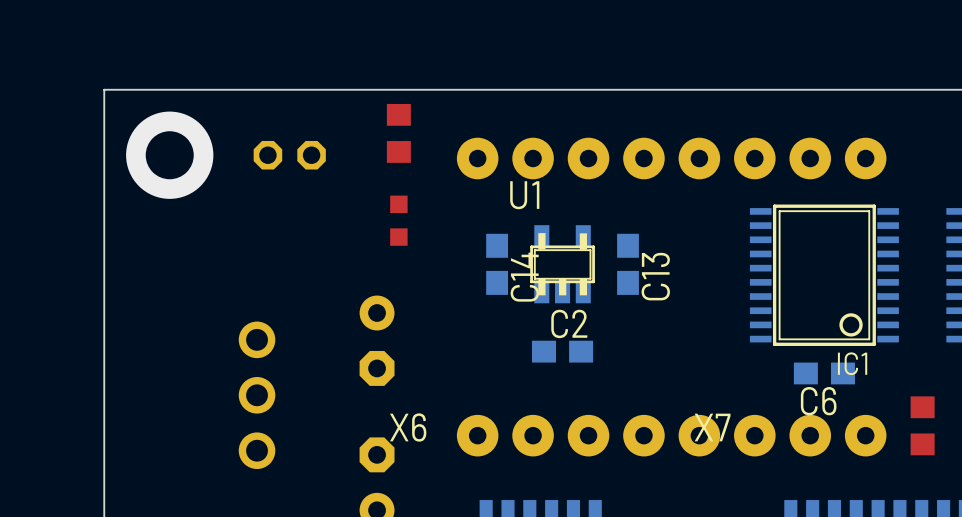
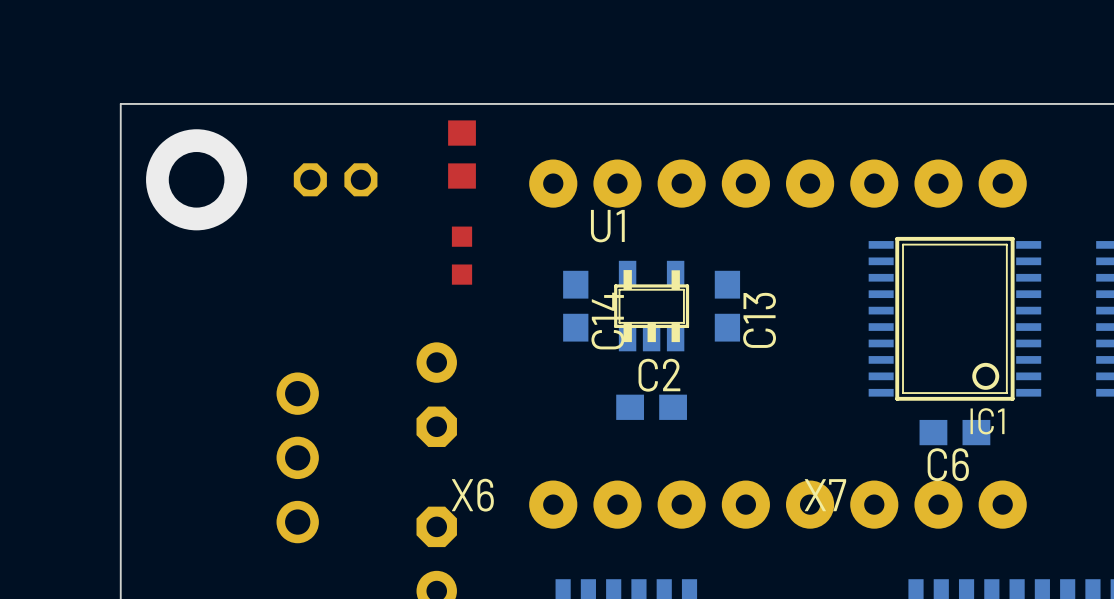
part: (922, 425) -> none

